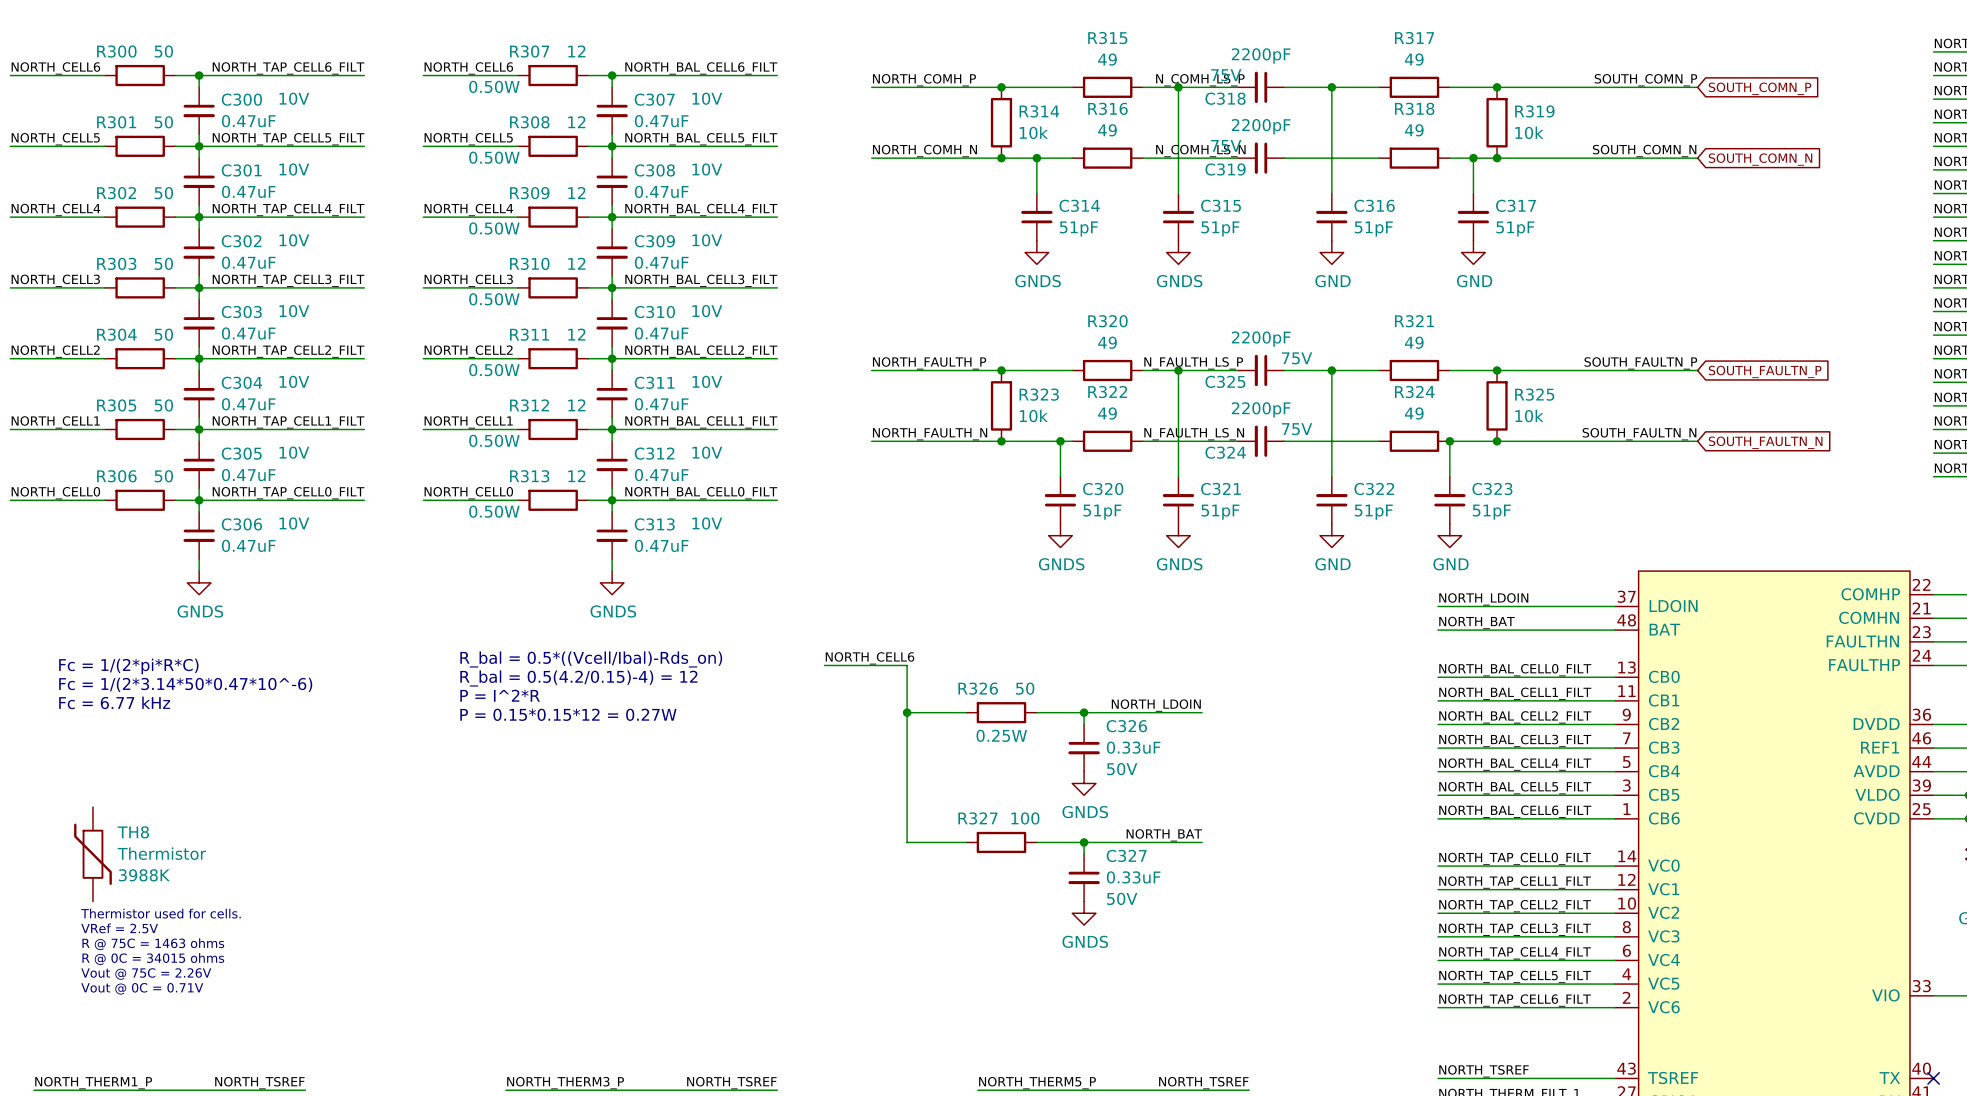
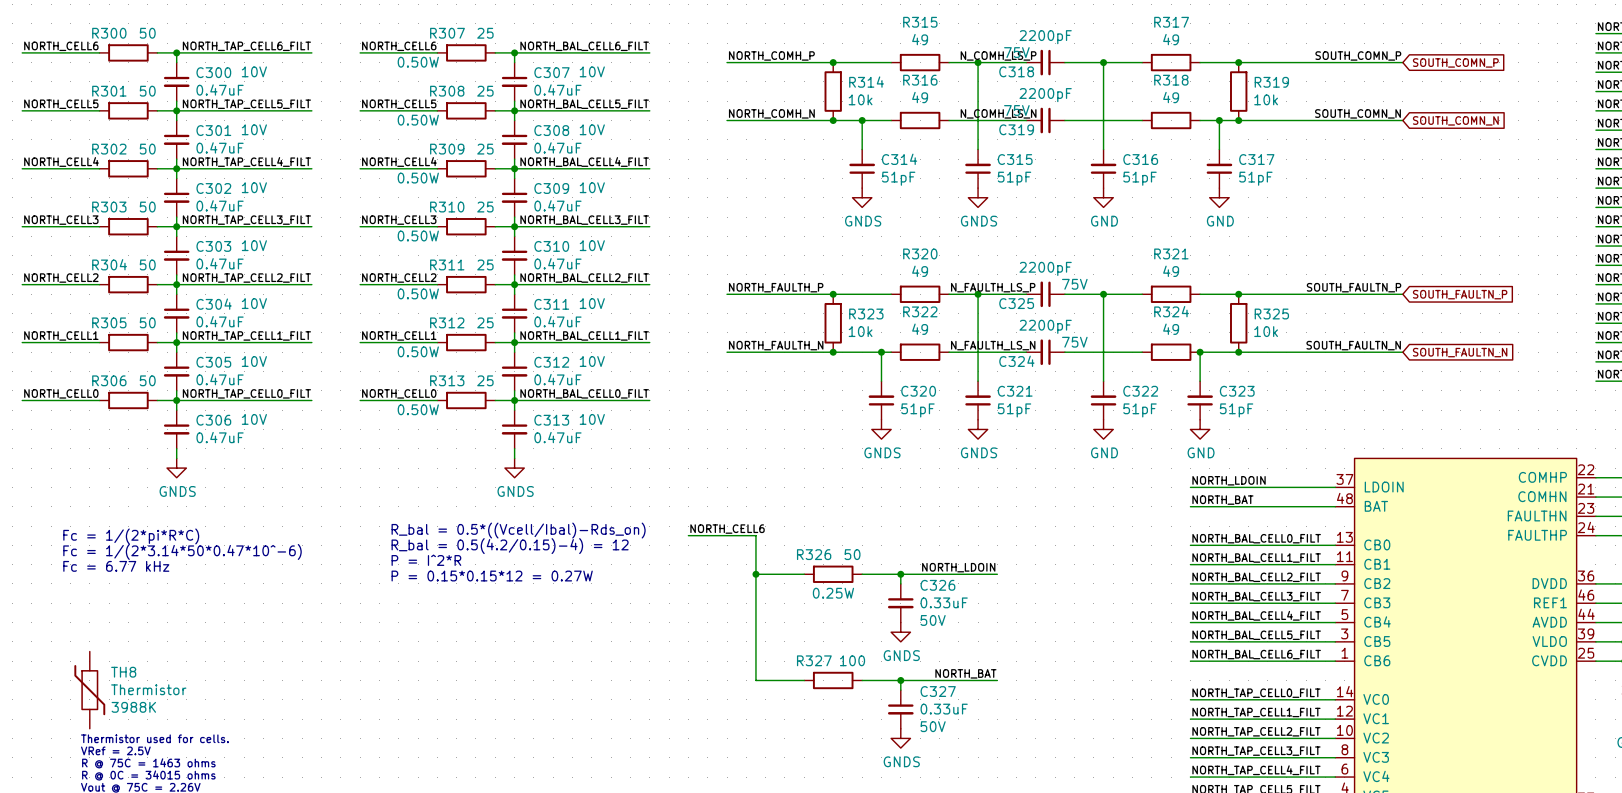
R307 value: 12 (576, 51) -> 25 (485, 33)
R308 value: 12 (576, 122) -> 25 (485, 91)
R309 value: 12 (576, 192) -> 25 (485, 149)
R310 value: 12 (576, 263) -> 25 (485, 207)
R311 value: 12 (576, 334) -> 25 (485, 264)
R312 value: 12 (576, 405) -> 25 (485, 322)
R313 value: 12 (576, 476) -> 25 (485, 380)

